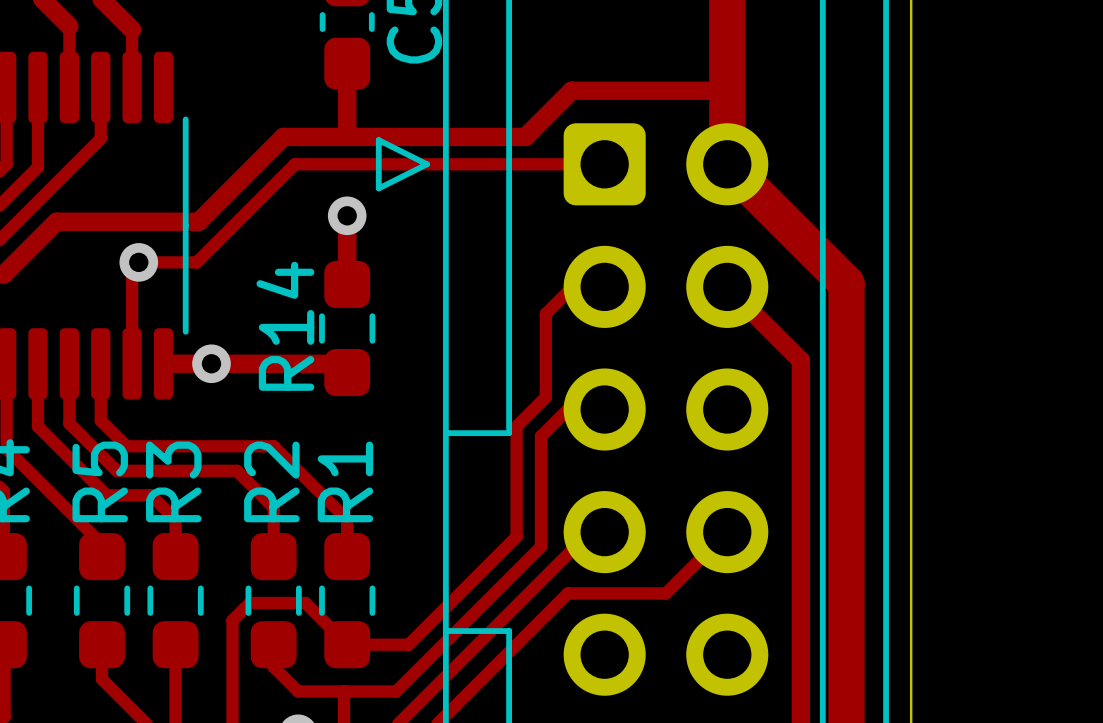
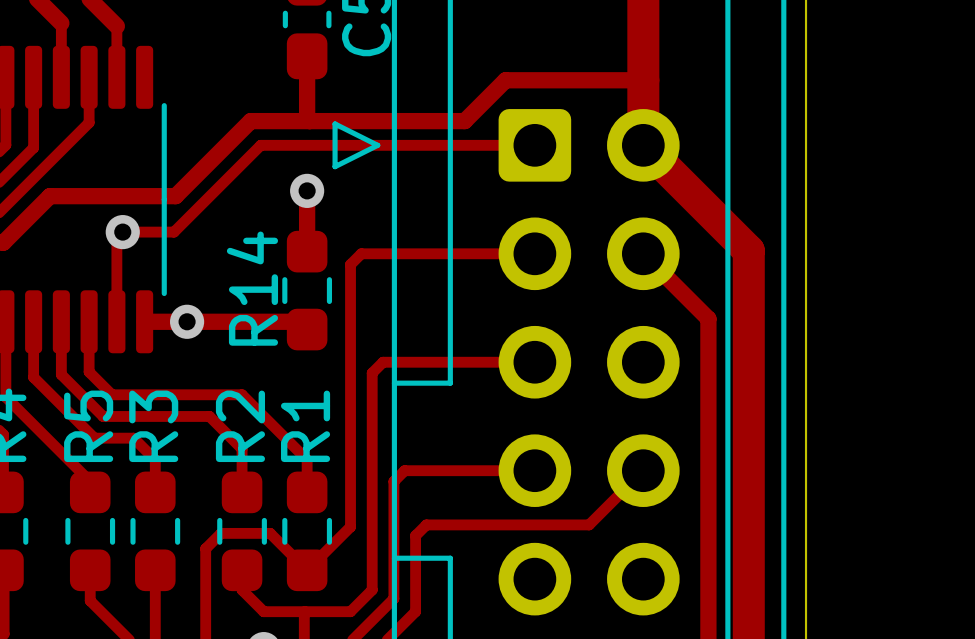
track: (572, 286) (545, 313) (545, 397) (516, 426) (516, 536) (408, 644) (347, 644) -> (506, 253) (361, 253) (350, 264) (350, 526) (307, 570)
track: (567, 409) (540, 436) (540, 546) (420, 666) -> (502, 362) (383, 362) (372, 373) (372, 589)
track: (590, 532) (445, 676) -> (521, 470) (404, 470) (393, 481) (393, 598)
track: (567, 593) (469, 691) -> (502, 524) (426, 524) (415, 535) (415, 611)

